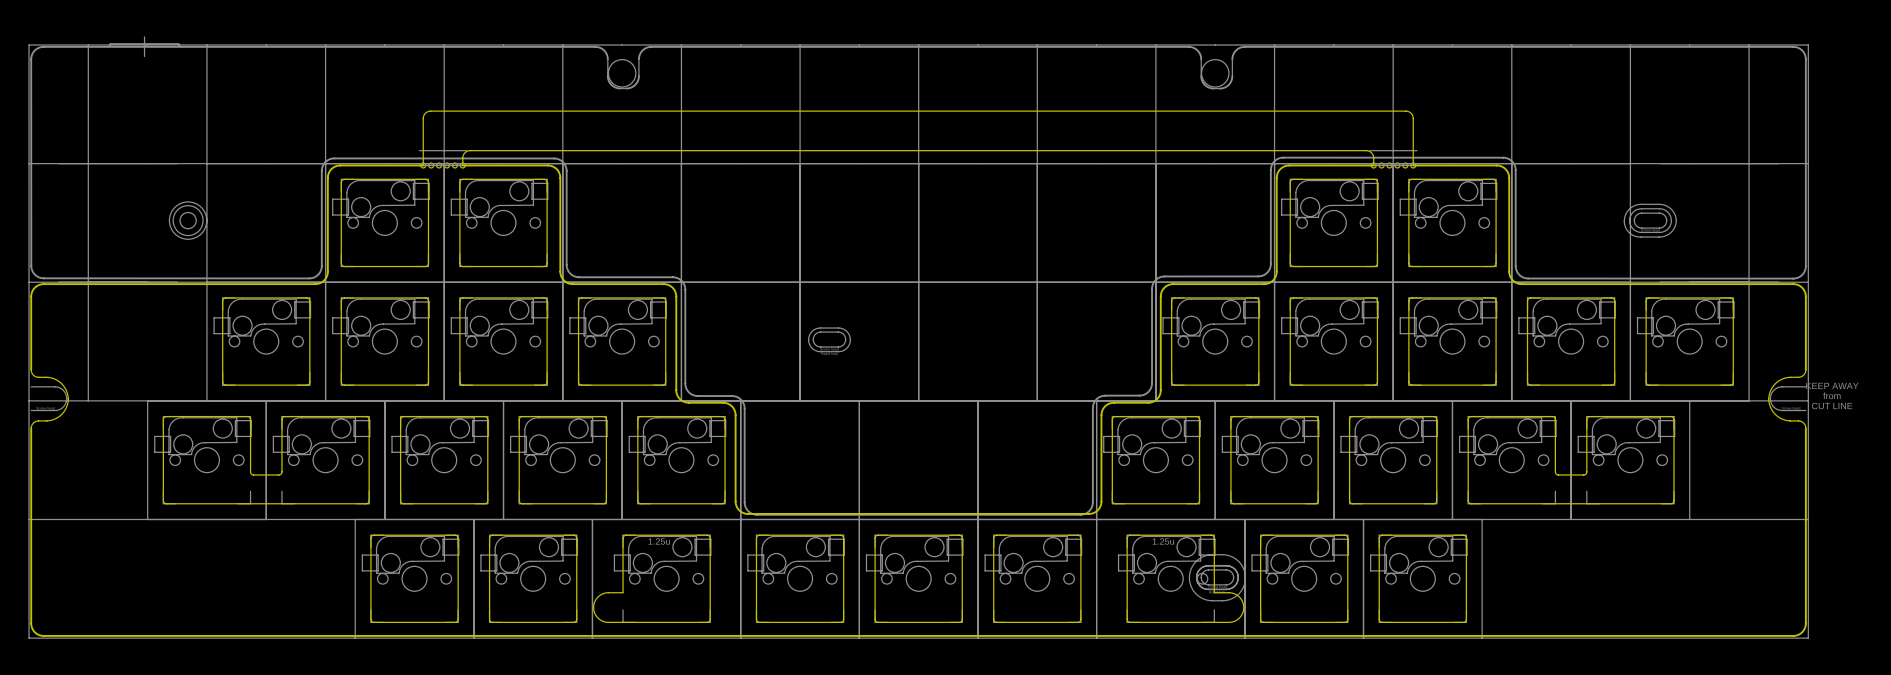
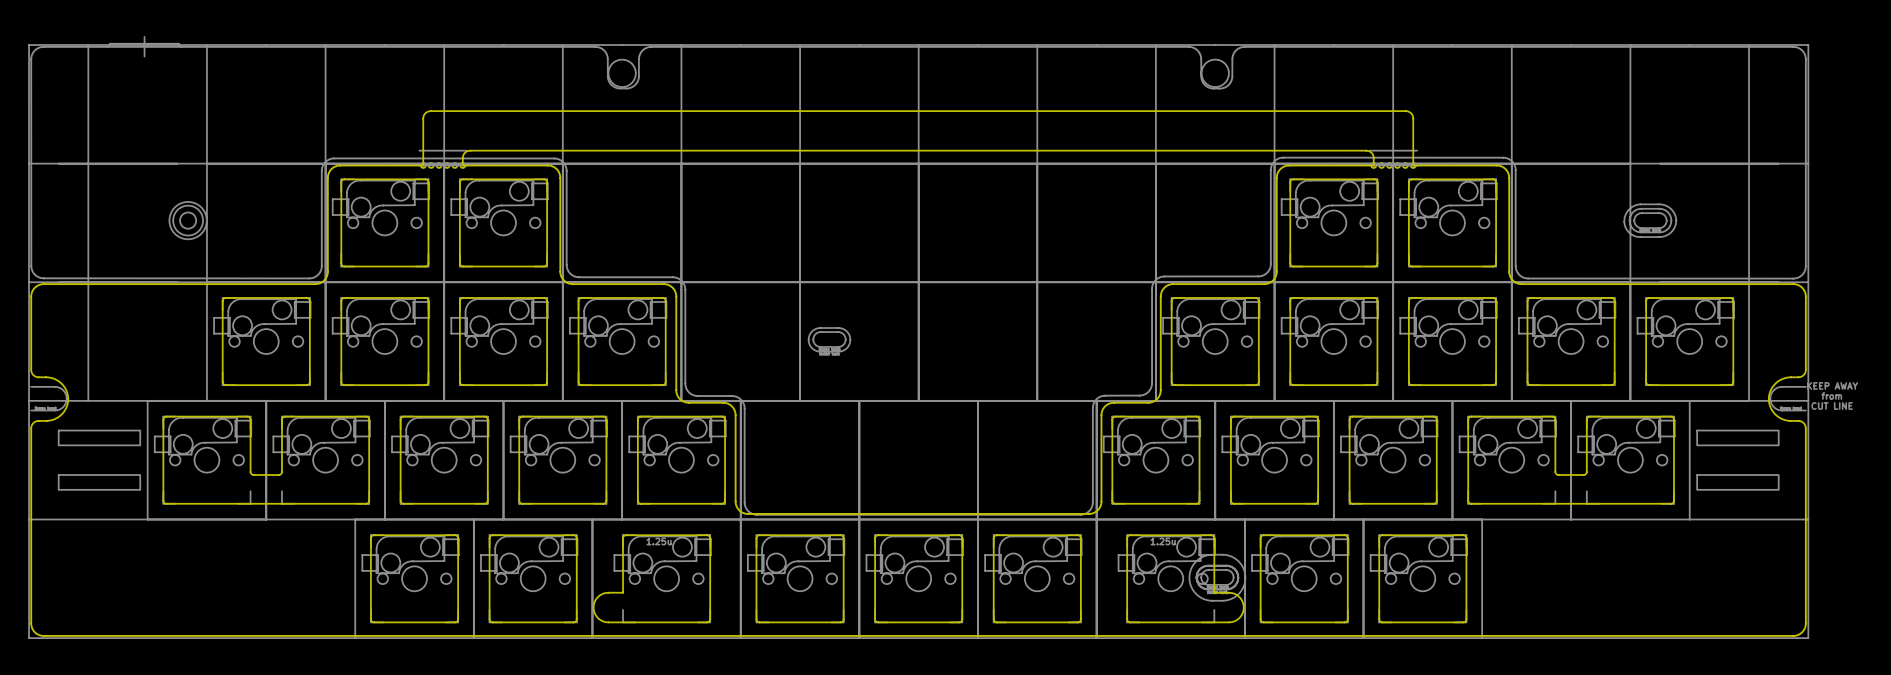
part footprint: [28, 36, 1809, 639] -> [28, 36, 1809, 639]

